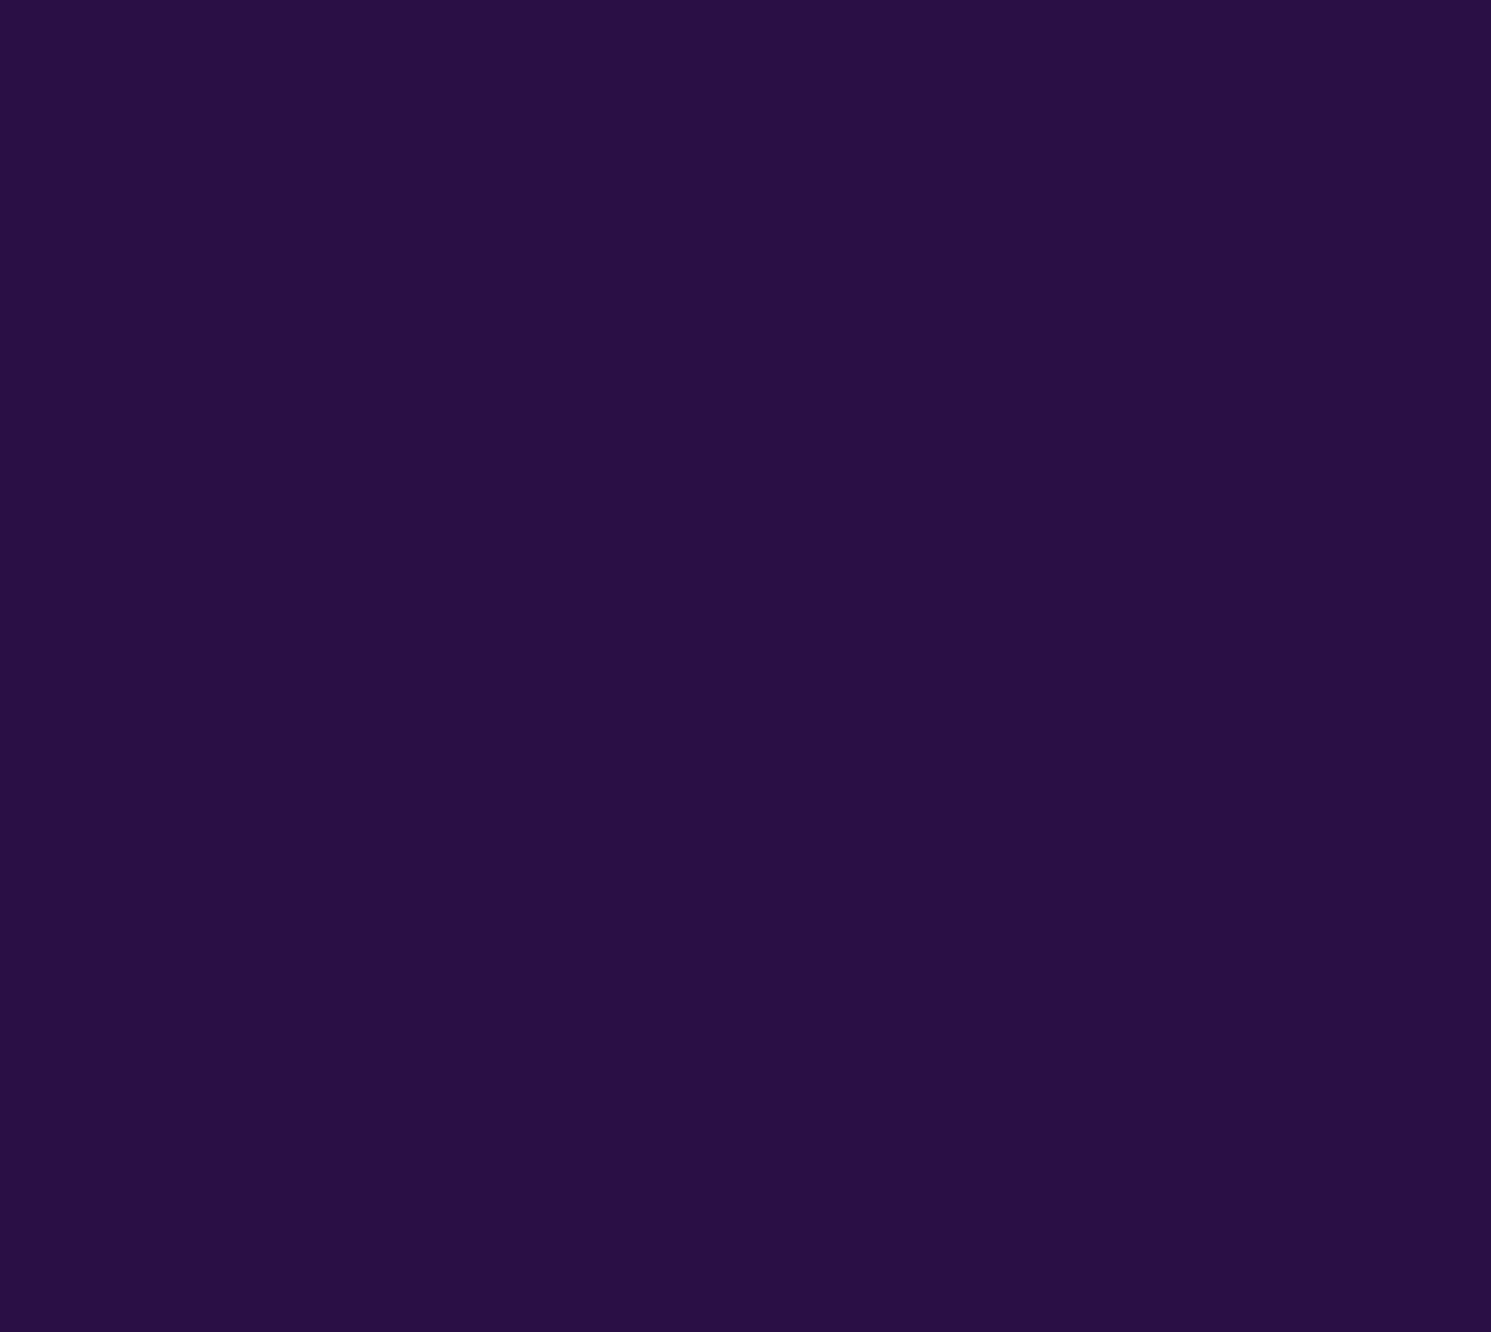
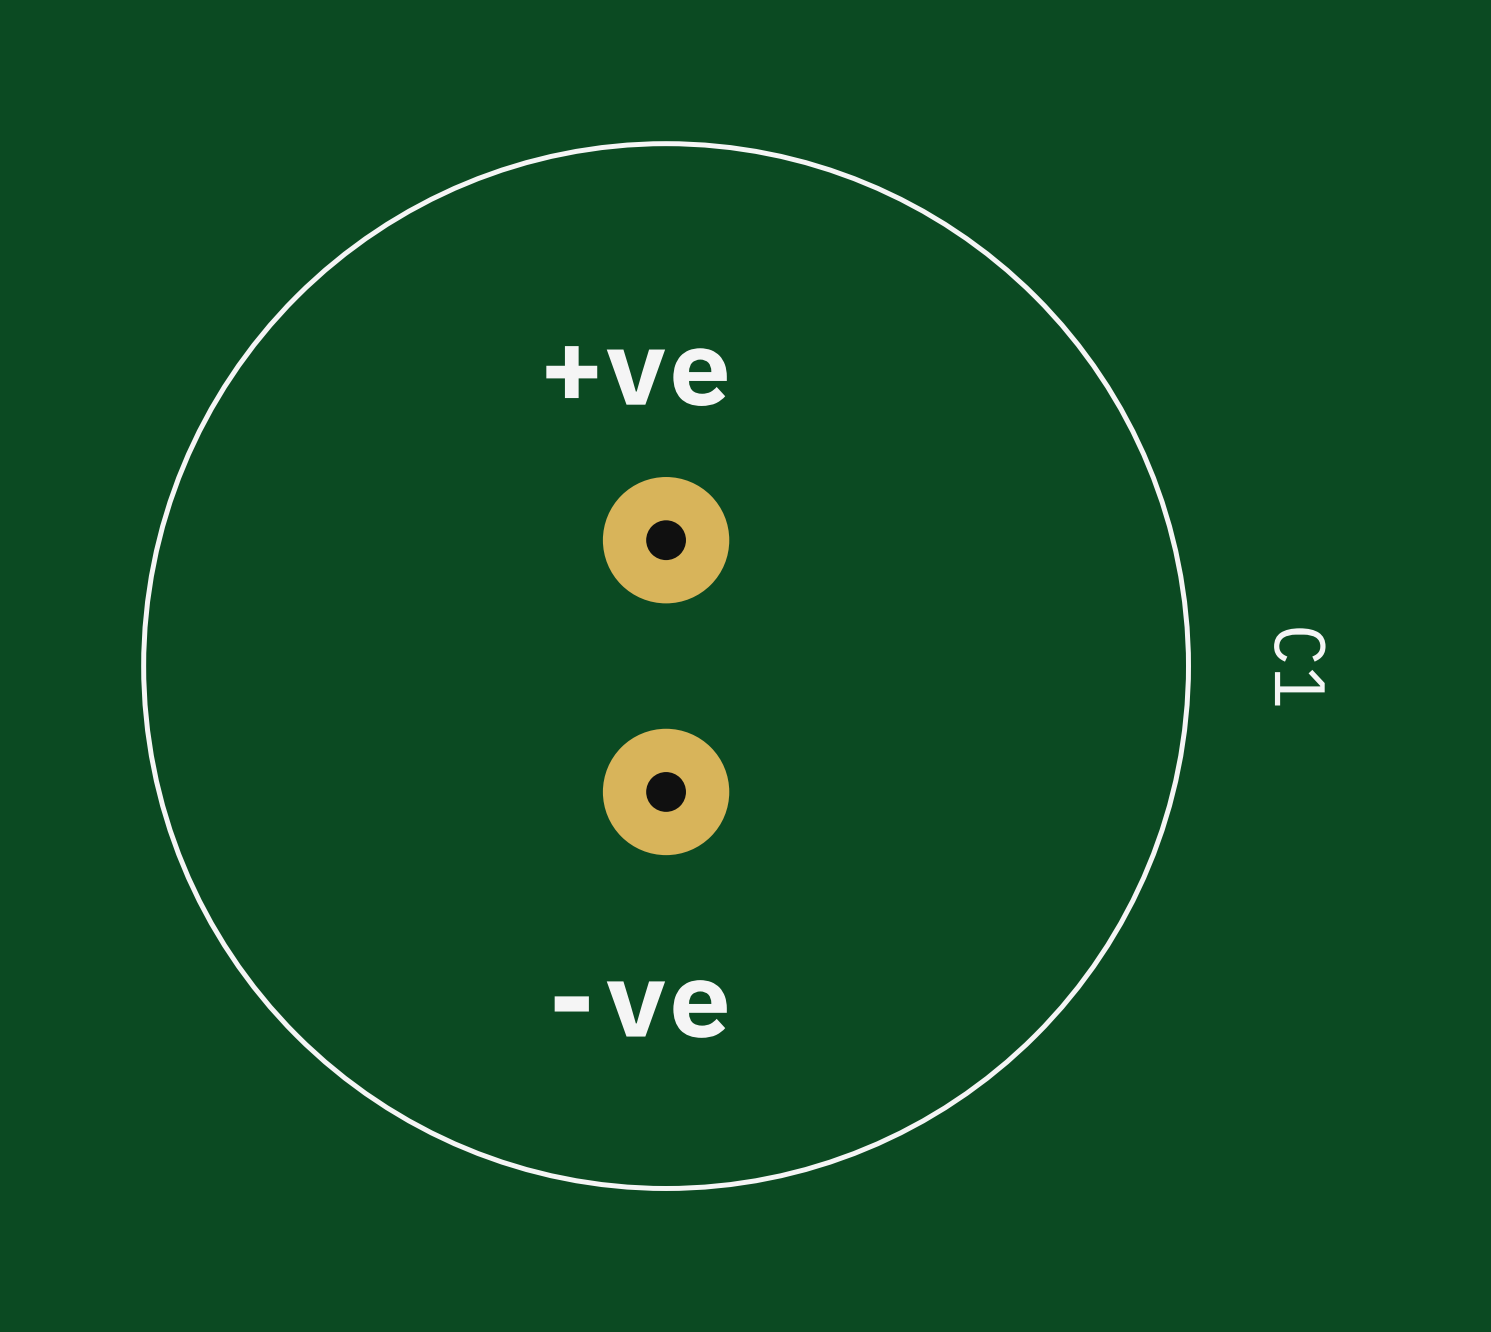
text: none -> +ve (636, 376)
C1: none -> (666, 666)
text: none -> -ve (640, 1008)

